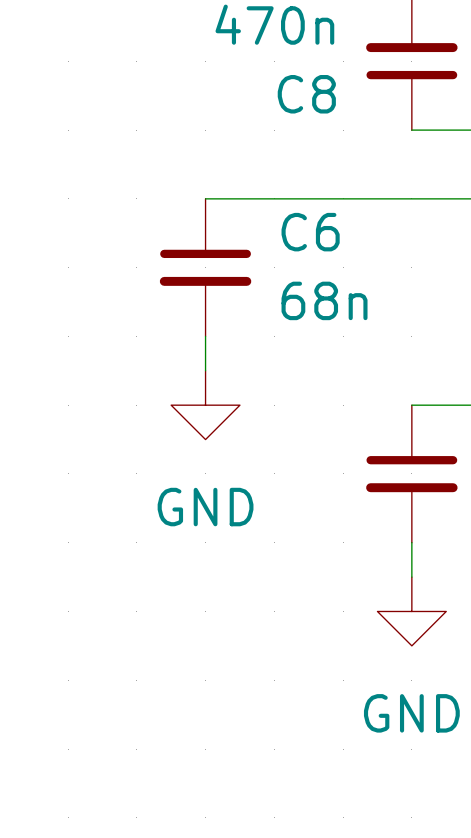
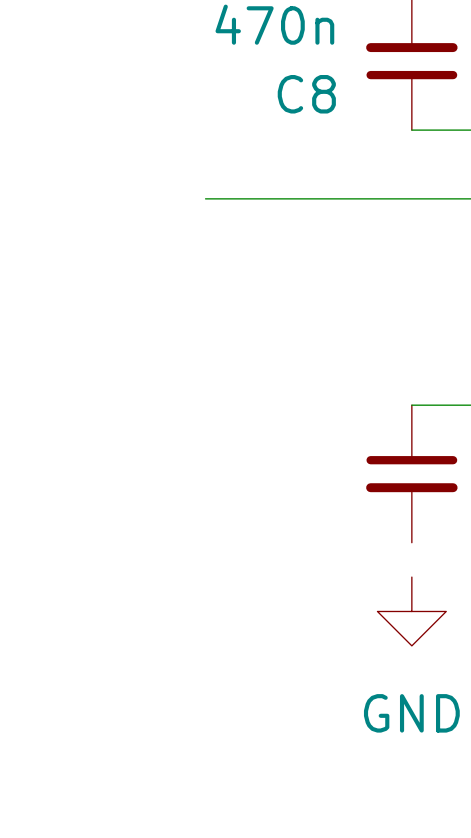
C6: 68n (205, 267) -> none
wire: (205, 336) (205, 370) -> none
power symbol: GND (205, 405) -> none
wire: (411, 542) (411, 577) -> none

